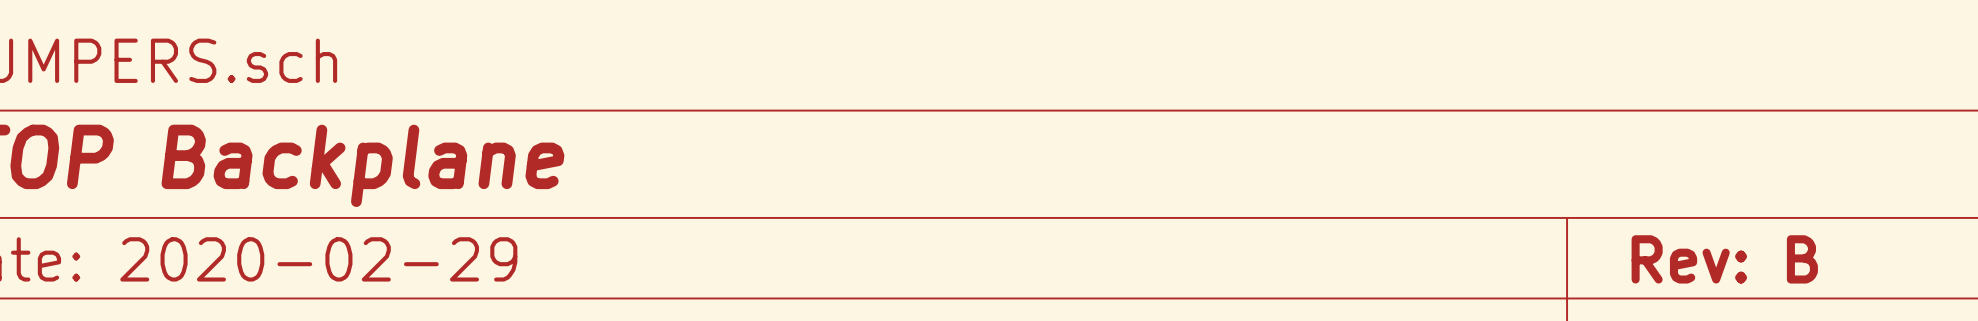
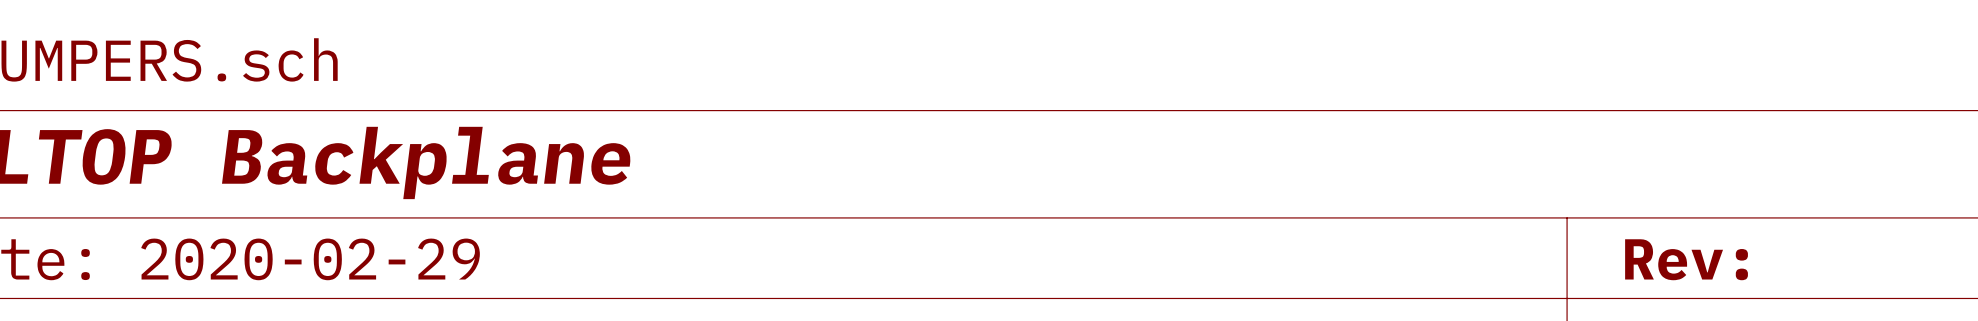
title block: Rev: B (1724, 259) -> Rev: (1686, 259)

